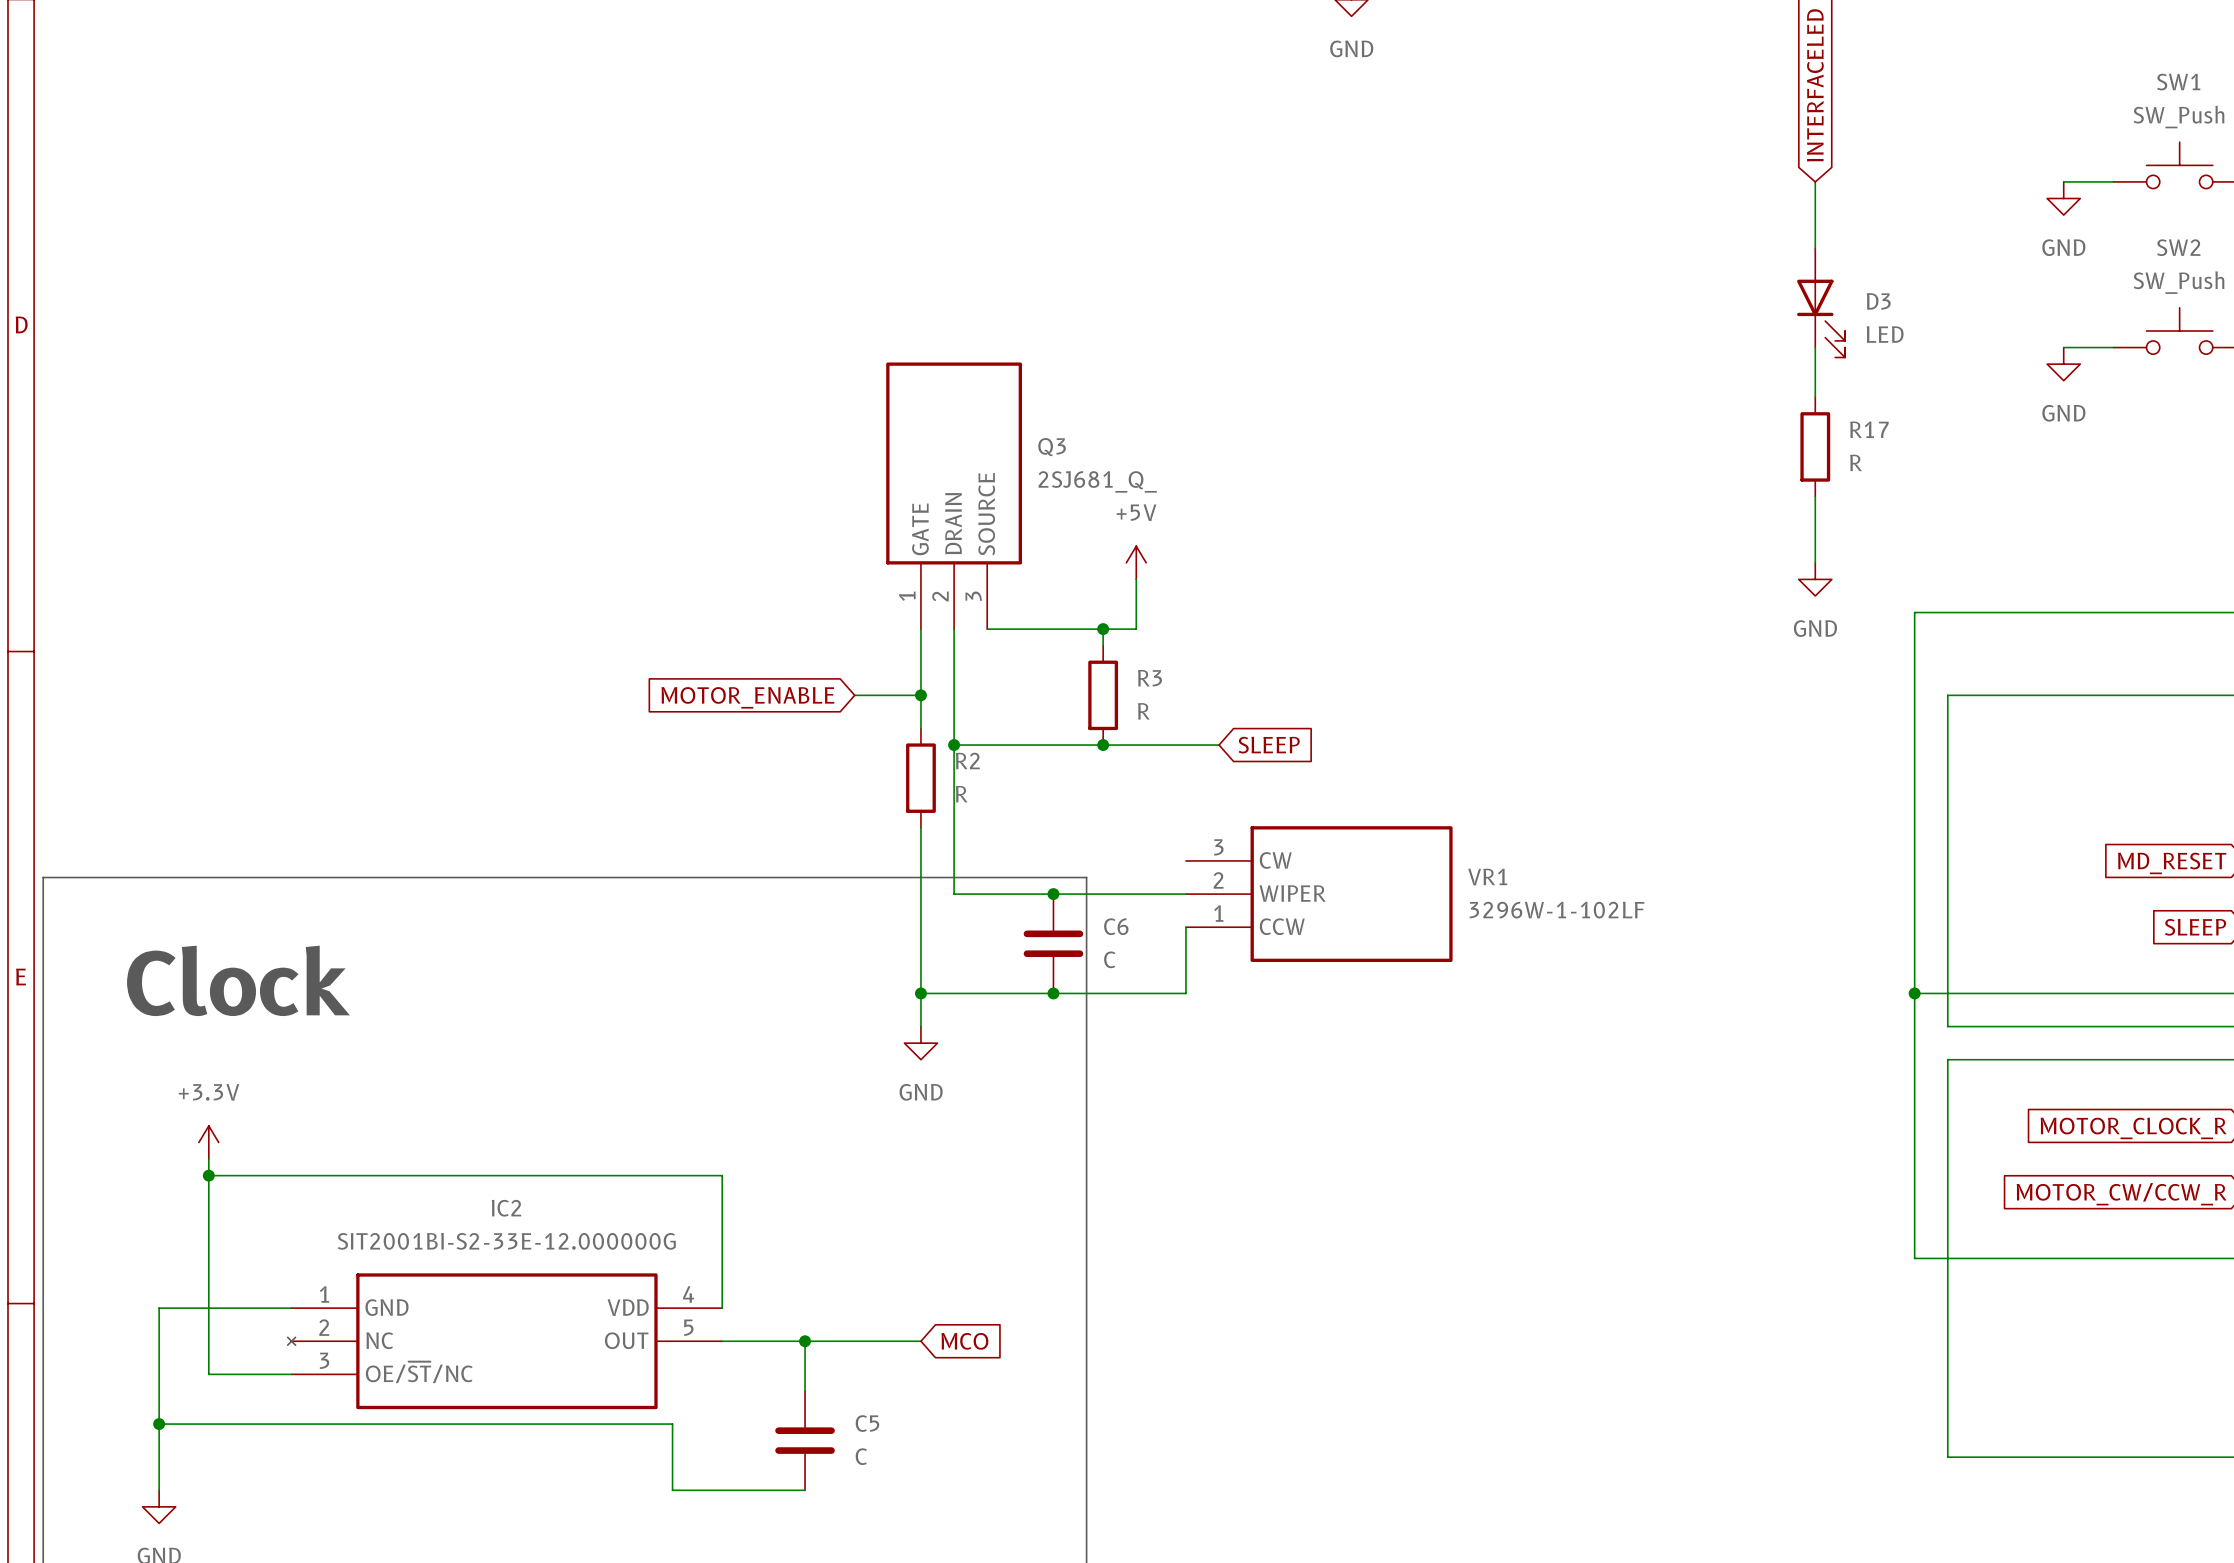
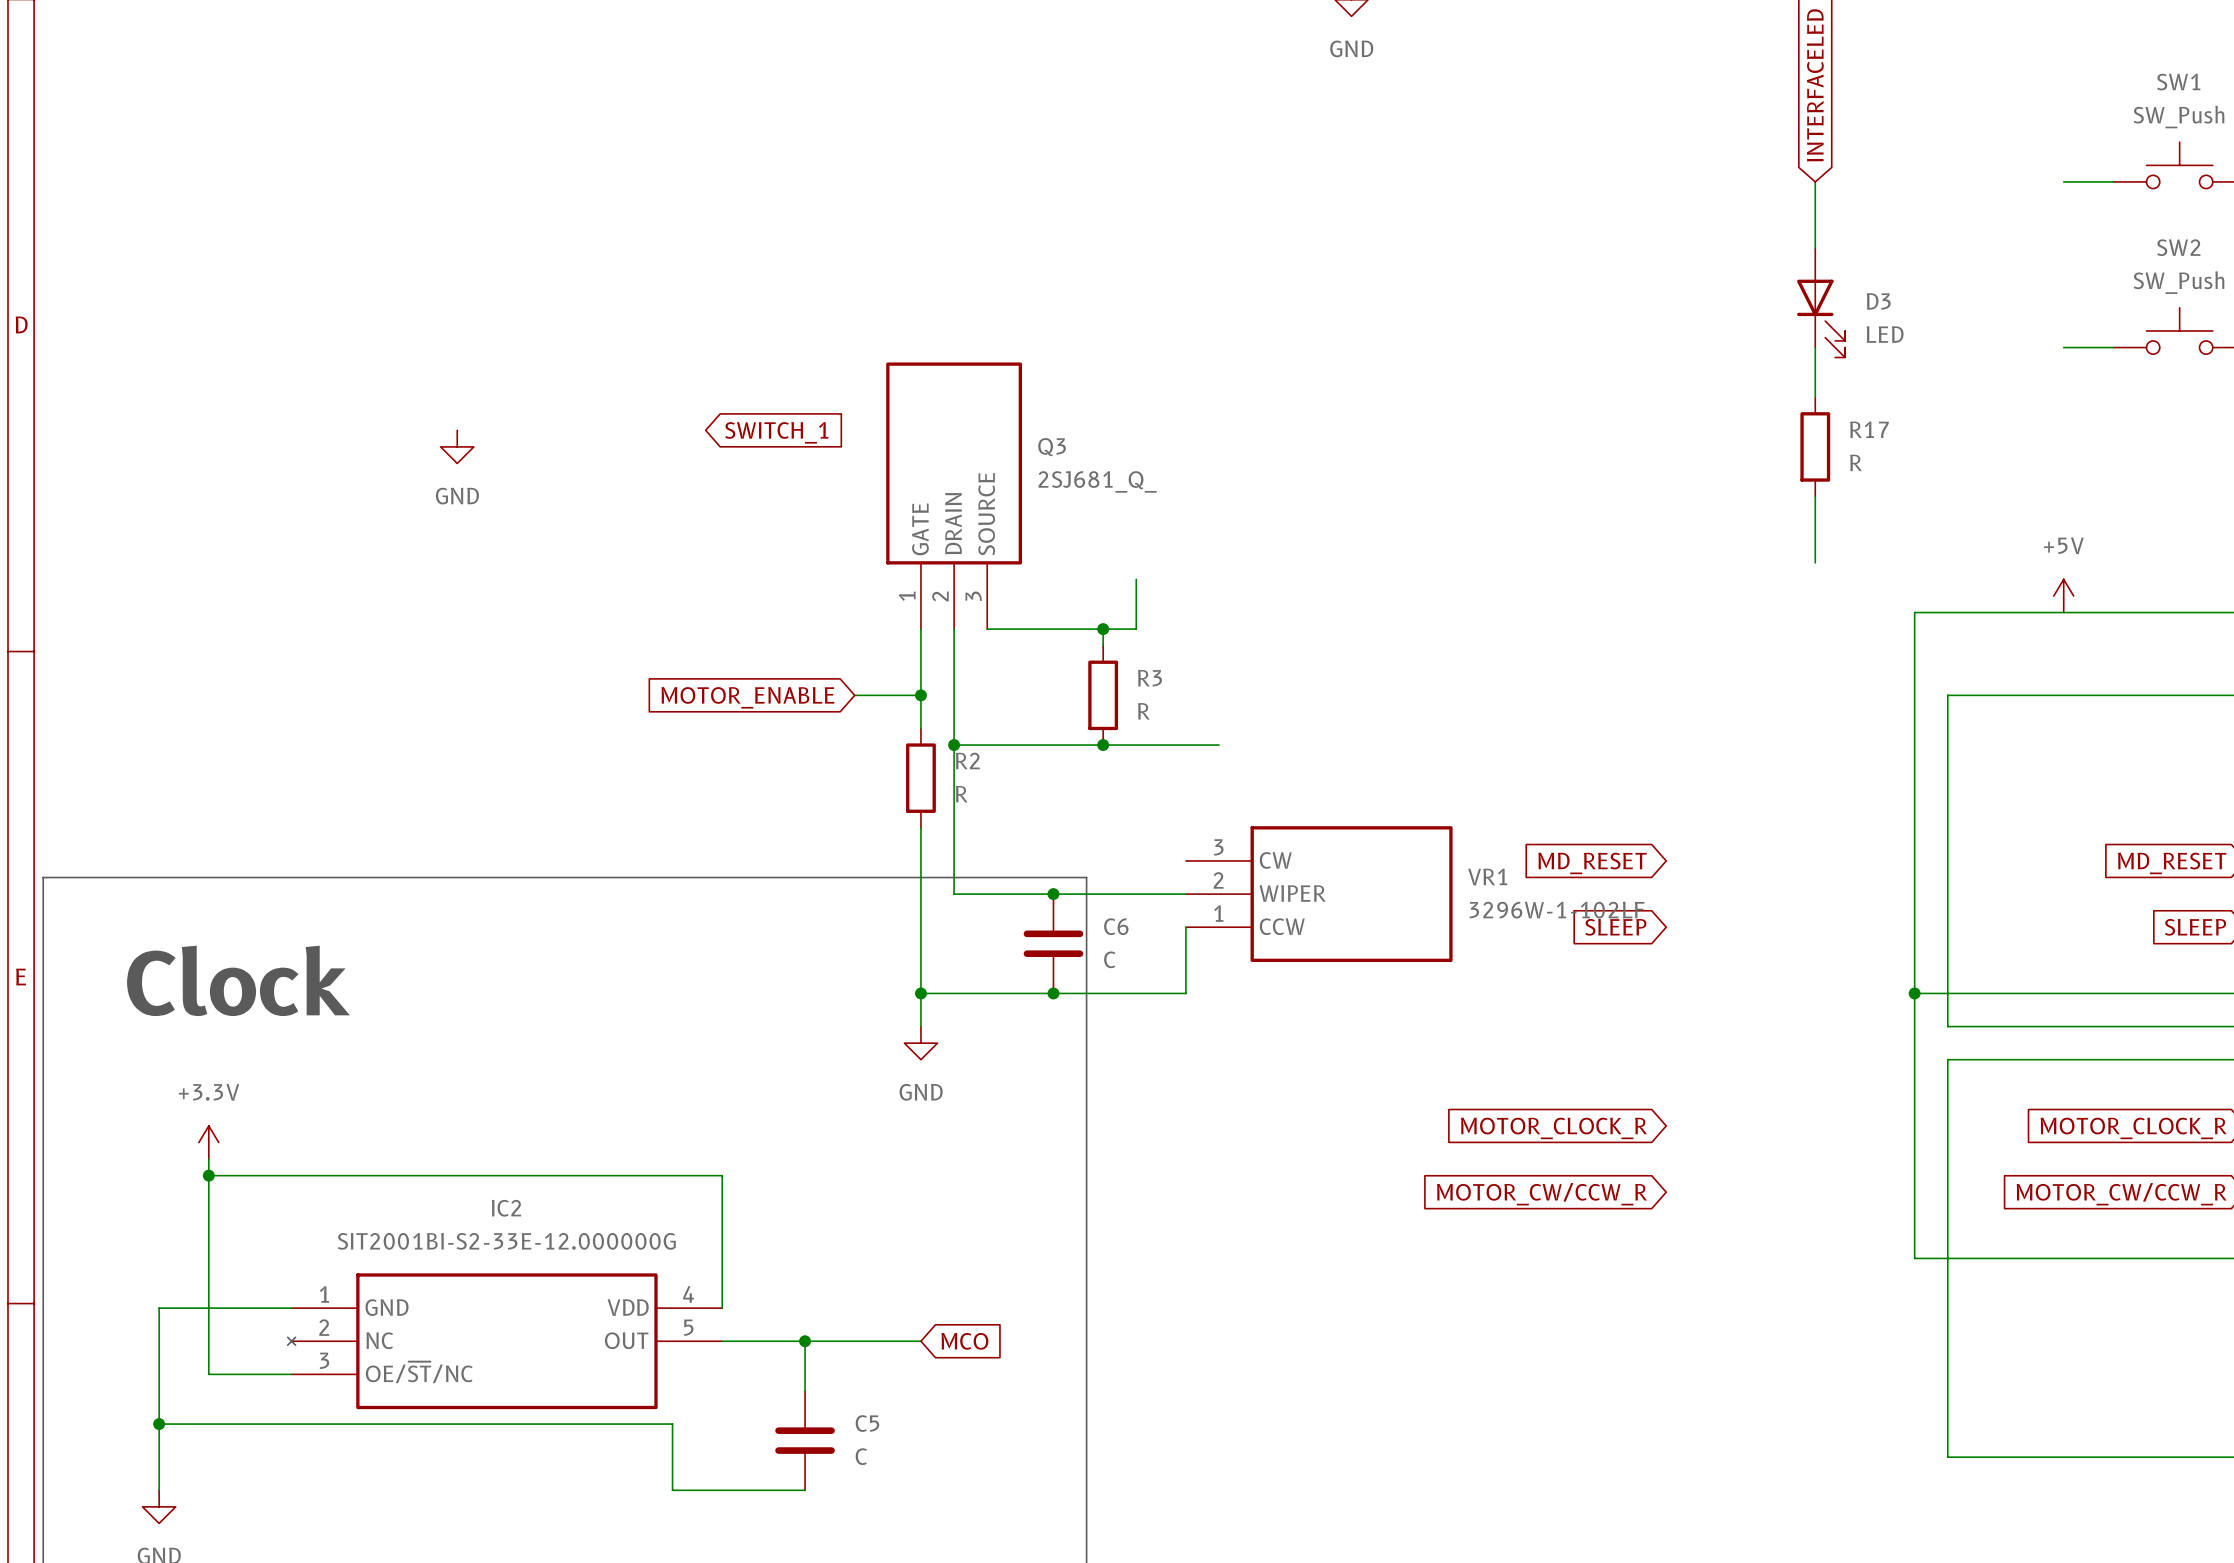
power symbol: GND (2063, 198) -> none
power symbol: GND (2063, 364) -> none
global label: none -> SWITCH_1 (776, 432)
power symbol: none -> GND (457, 446)
power symbol: +5V (1136, 562) -> none
power symbol: GND (1815, 579) -> none
power symbol: none -> +5V (2063, 595)
global label: SLEEP (1269, 745) -> none
global label: none -> MD_RESET (1592, 863)
global label: none -> SLEEP (1615, 927)
global label: none -> MOTOR_CLOCK_R (1553, 1128)
global label: none -> MOTOR_CW/CCW_R (1541, 1194)

